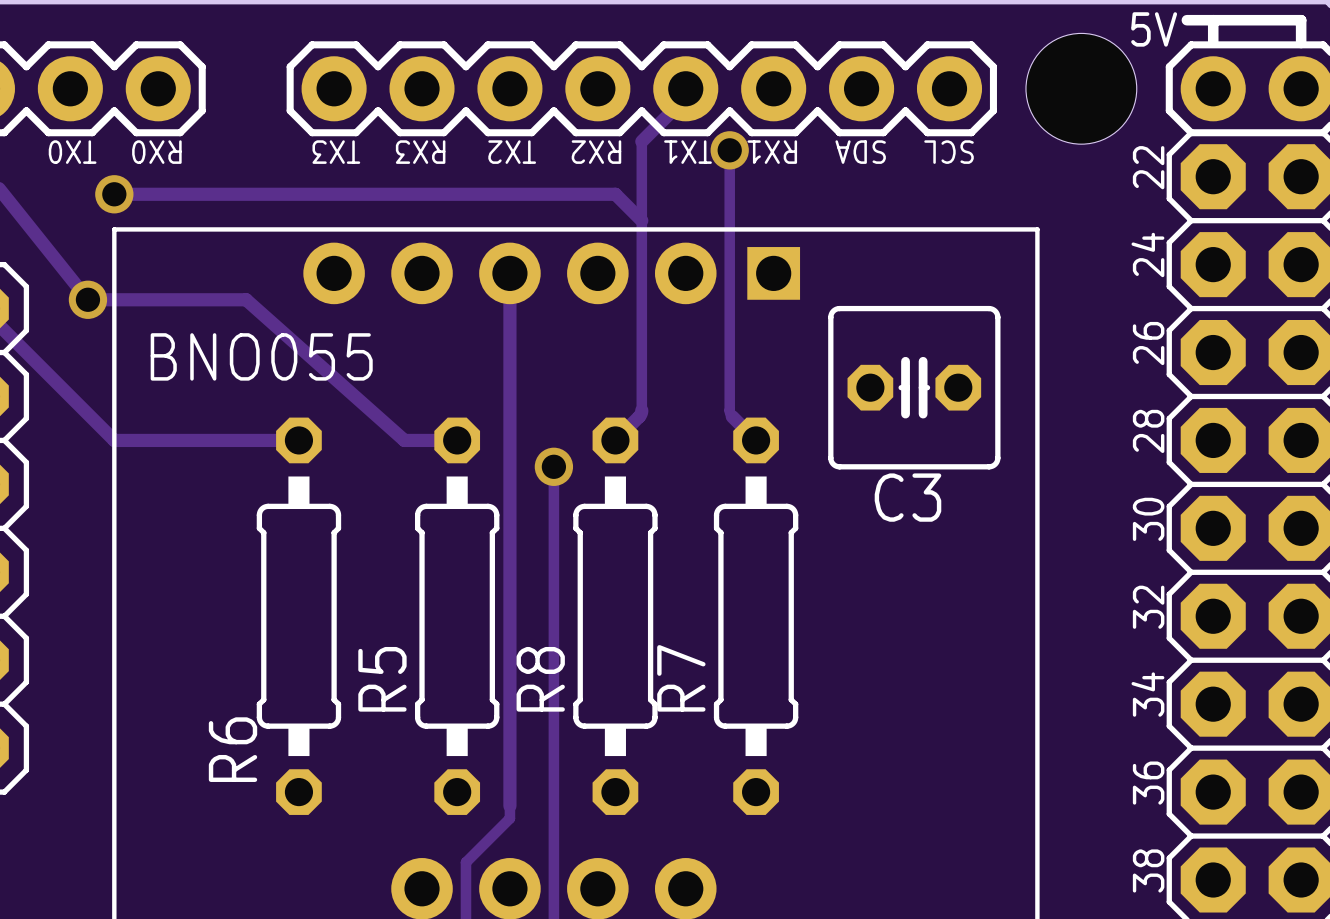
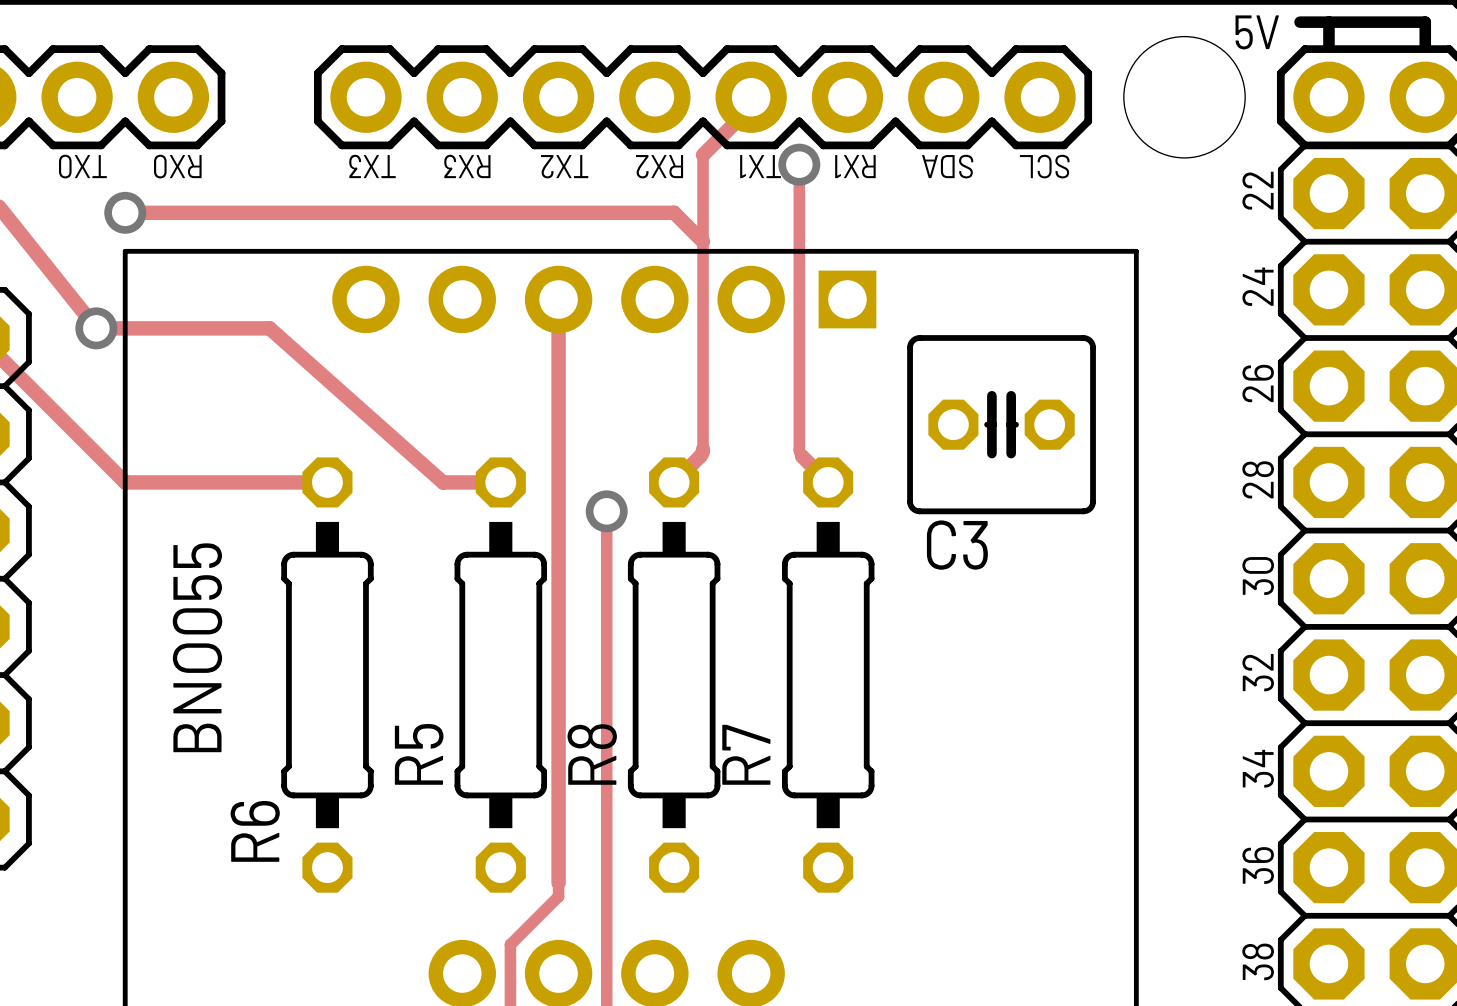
BNO055 name: BNO055 (261, 356) -> none
C3 name position: C3 (907, 497) -> C3 (957, 545)
BNO055 text: none -> BNO055 (197, 647)

